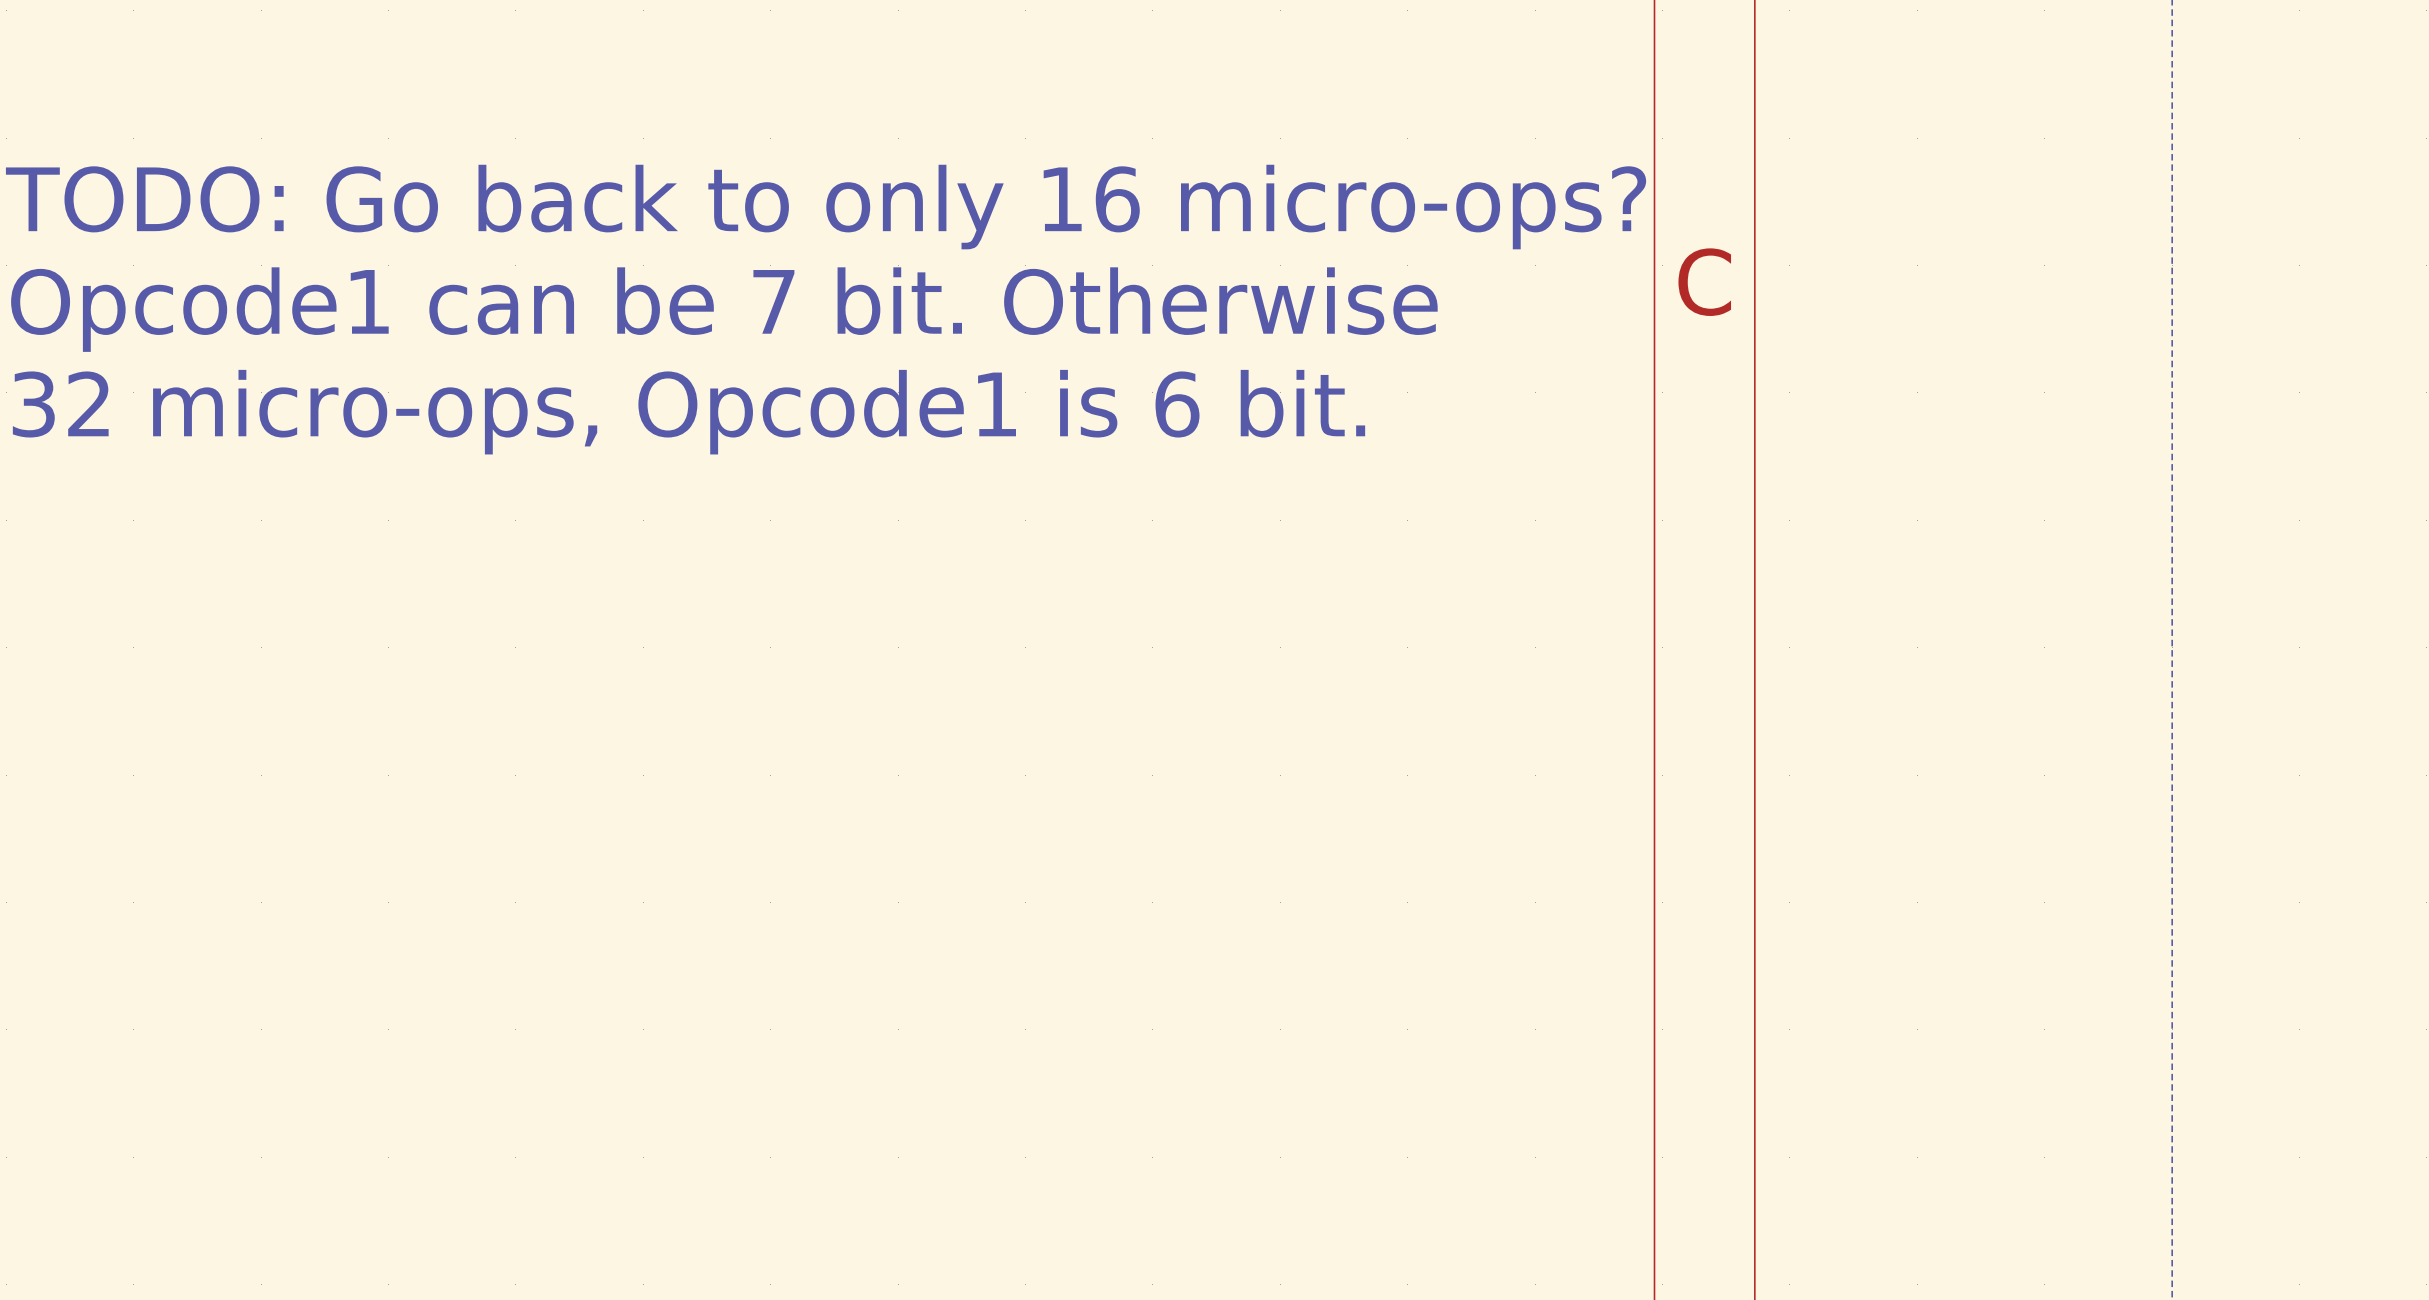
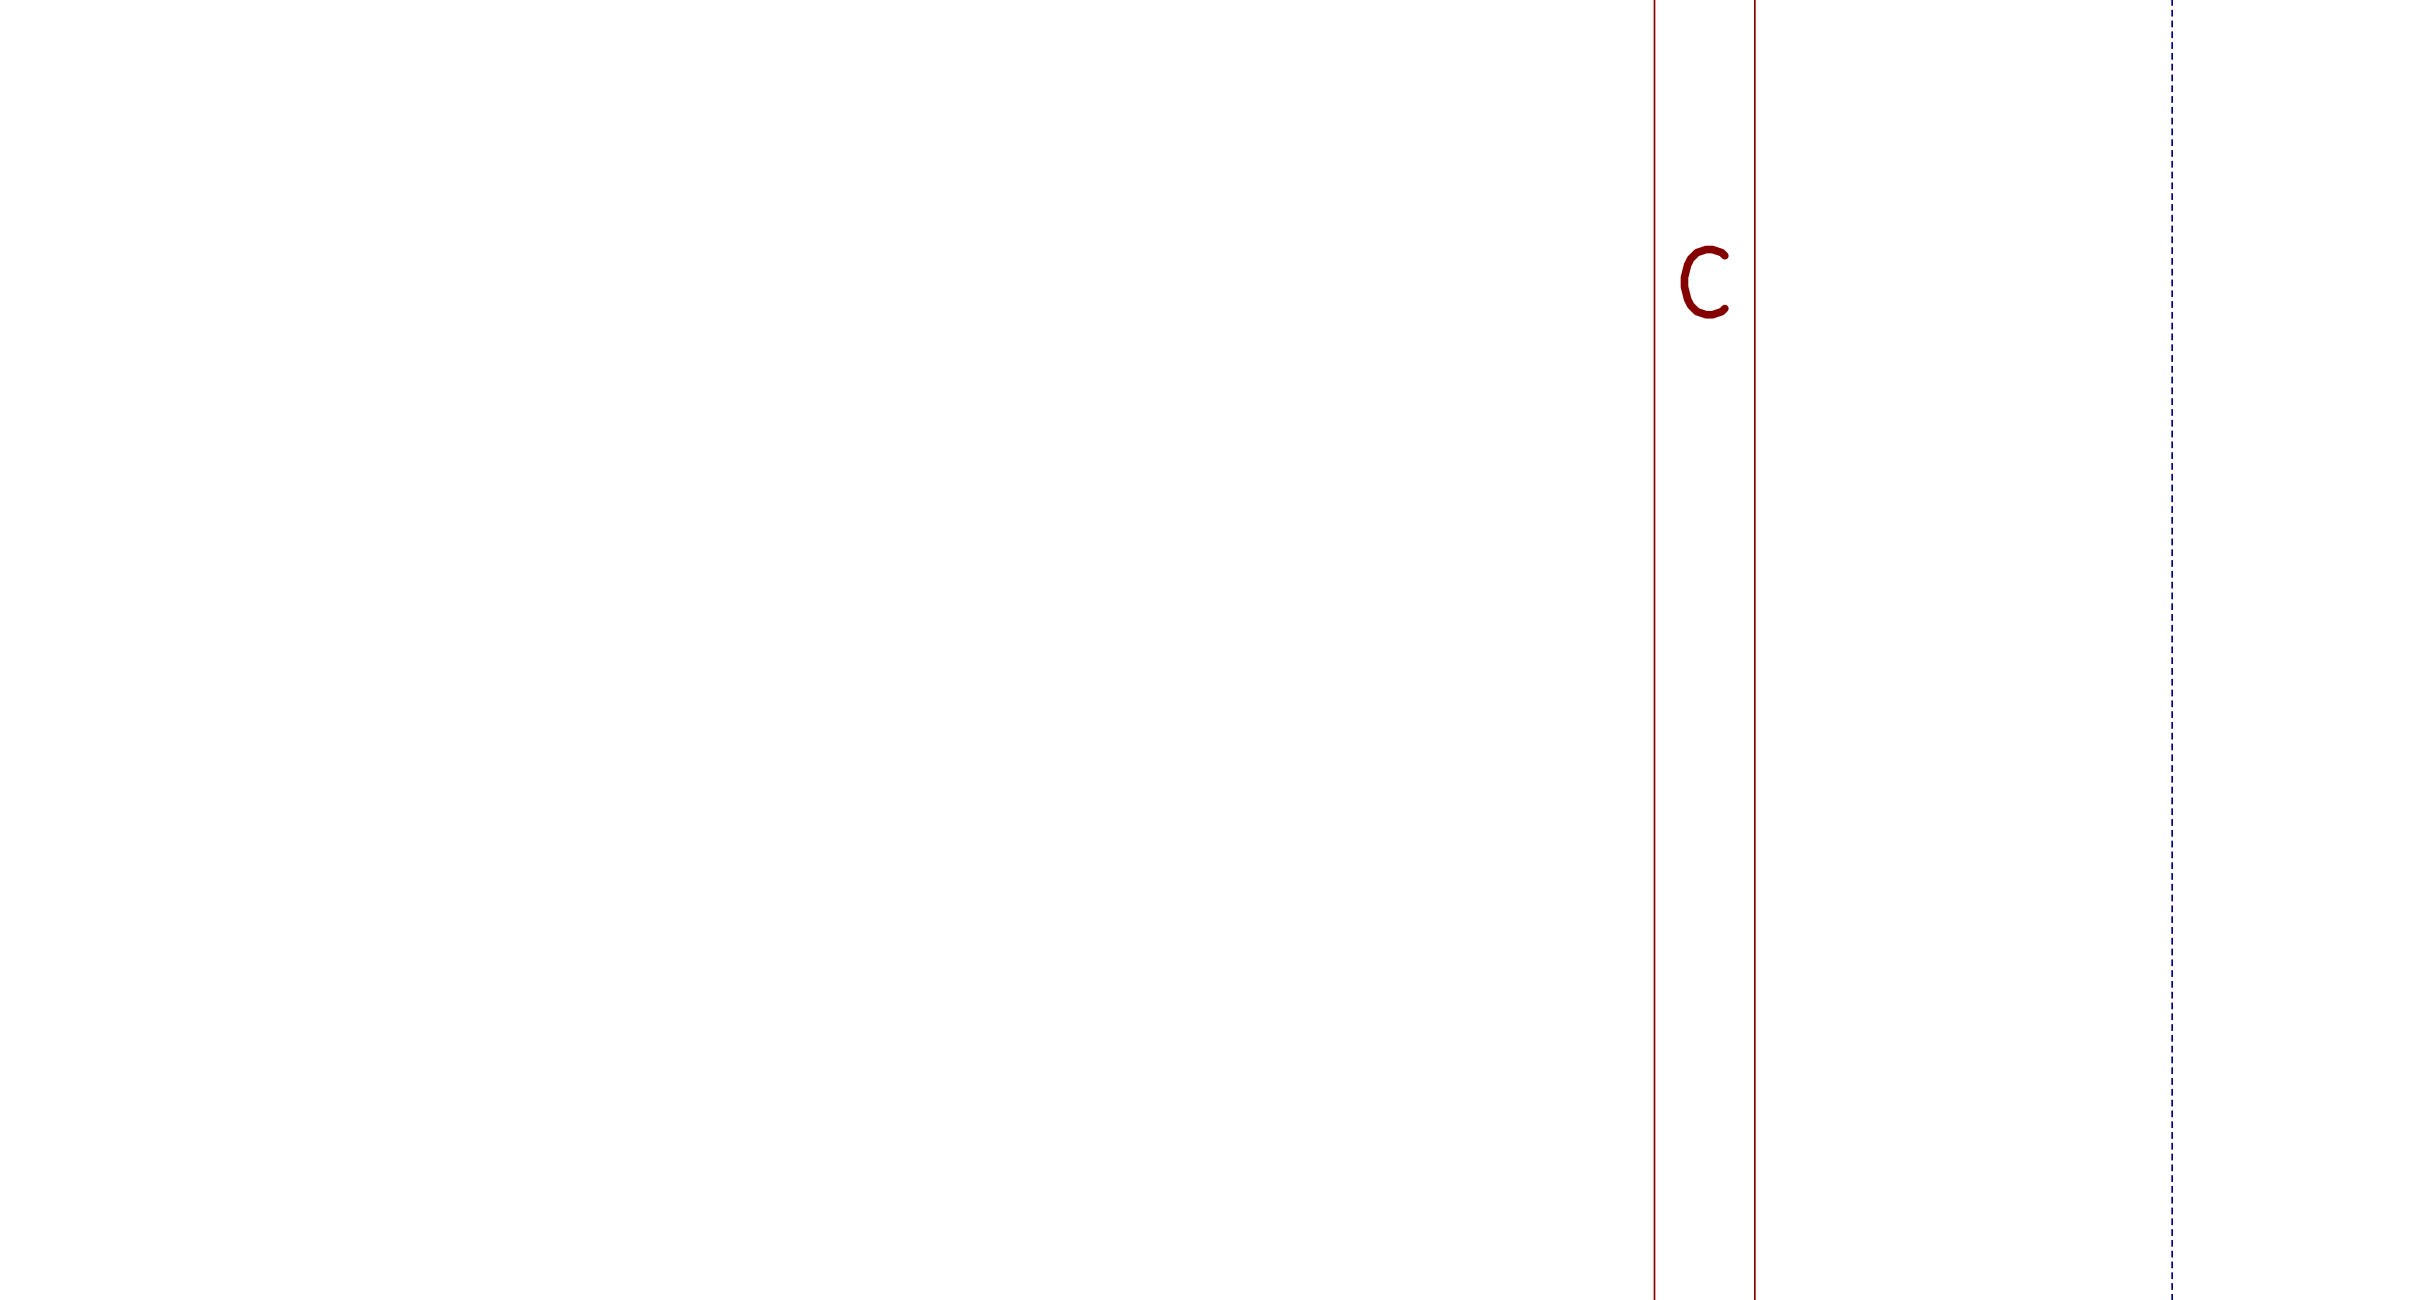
text: TODO: Go back to only 16 micro-ops? (826, 207) -> none
text: Opcode1 can be 7 bit. Otherwise (724, 309) -> none
text: 32 micro-ops, Opcode1 is 6 bit. (689, 412) -> none

